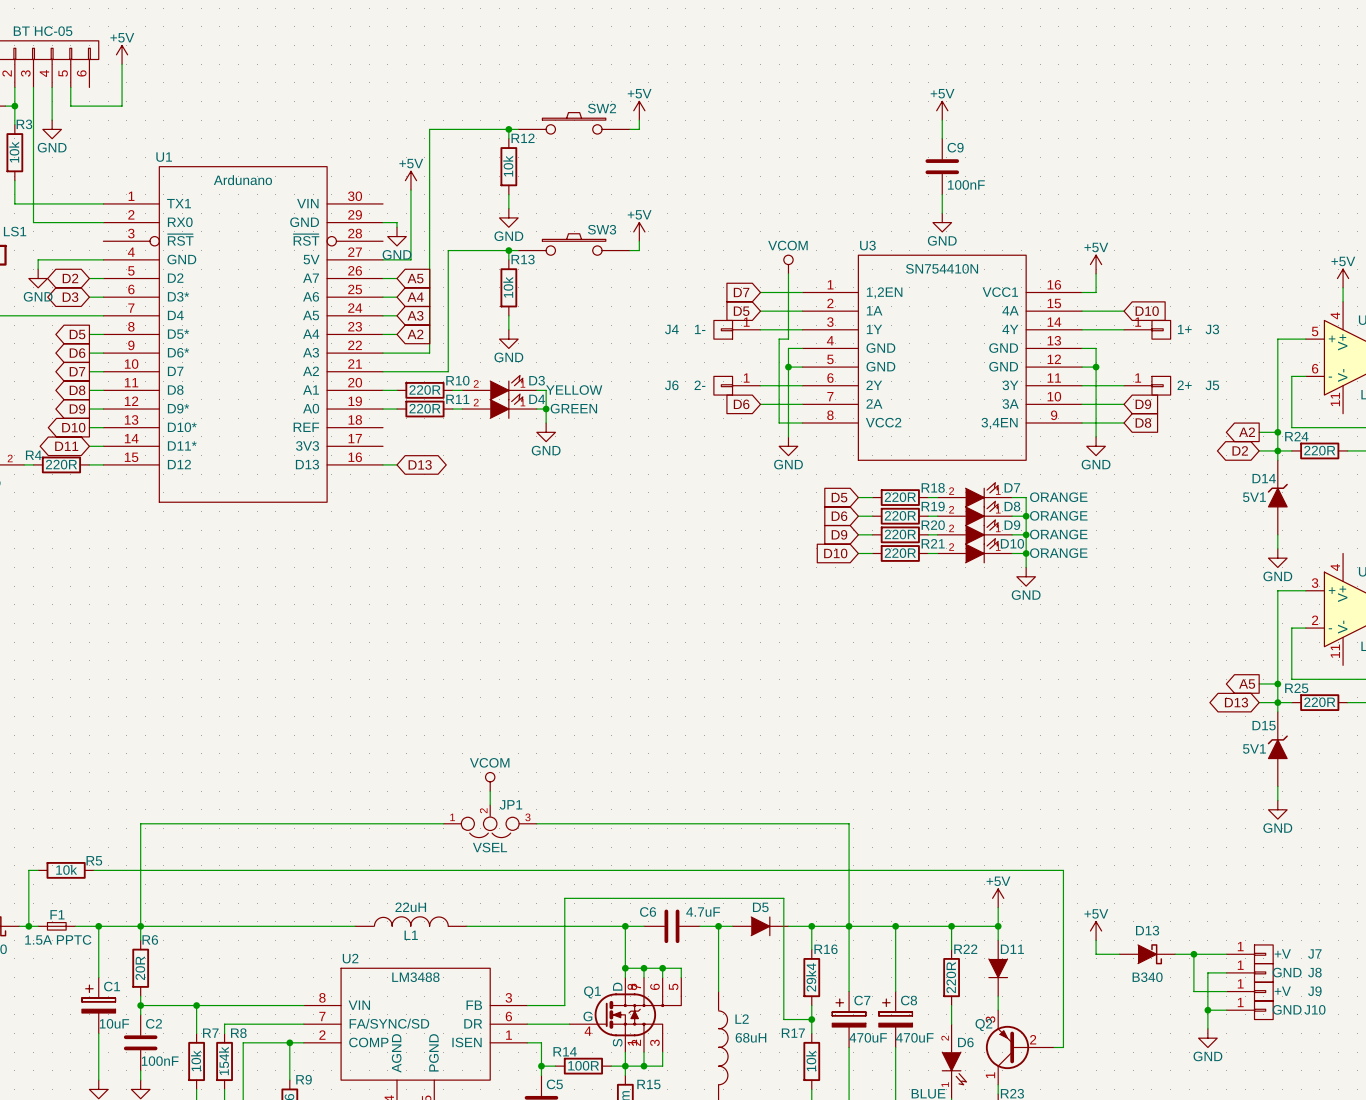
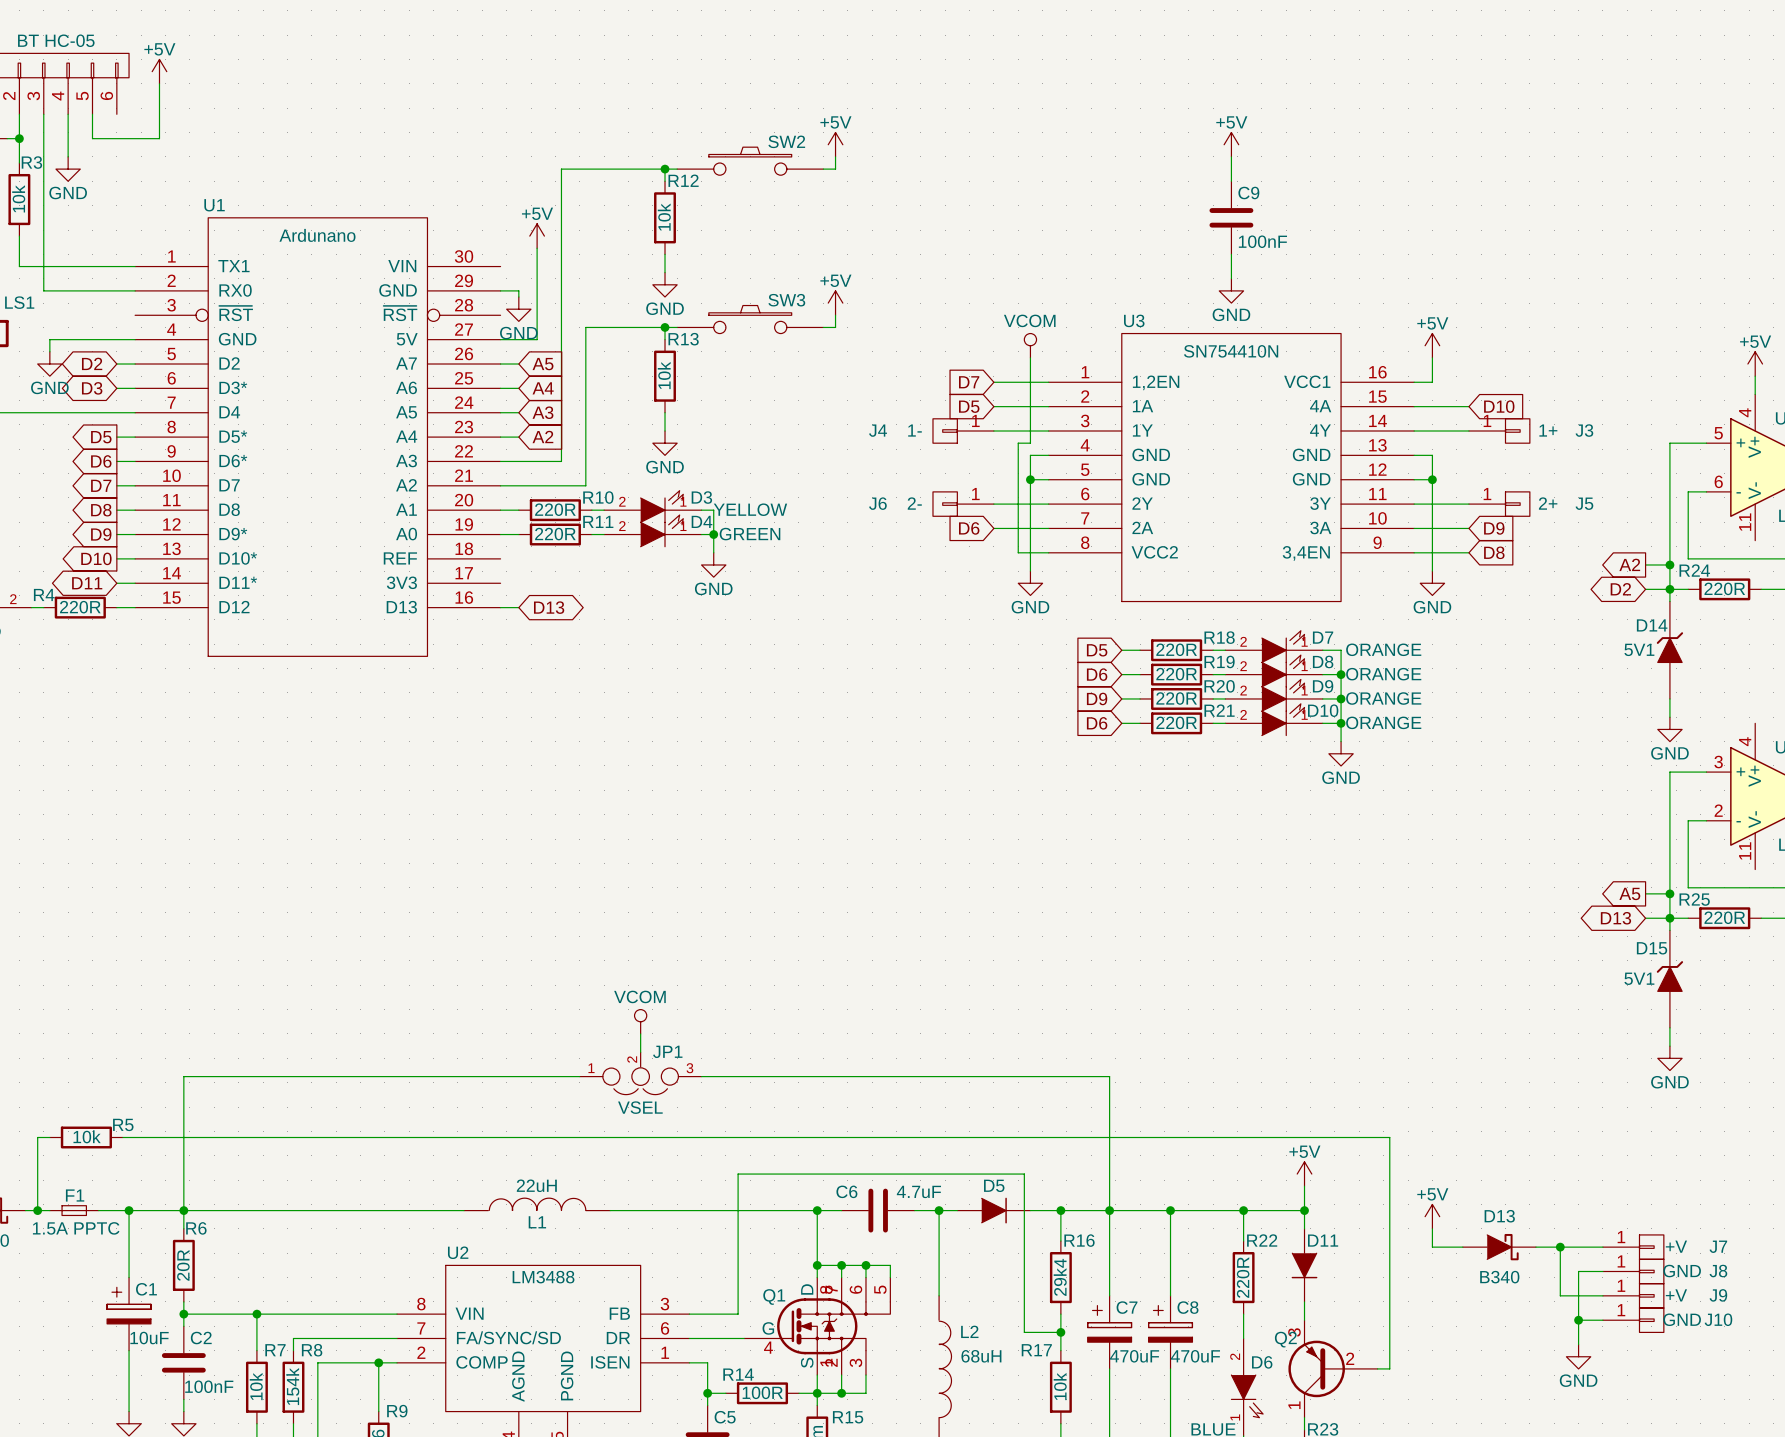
global label: D10 (835, 553) -> D6 (1097, 723)

